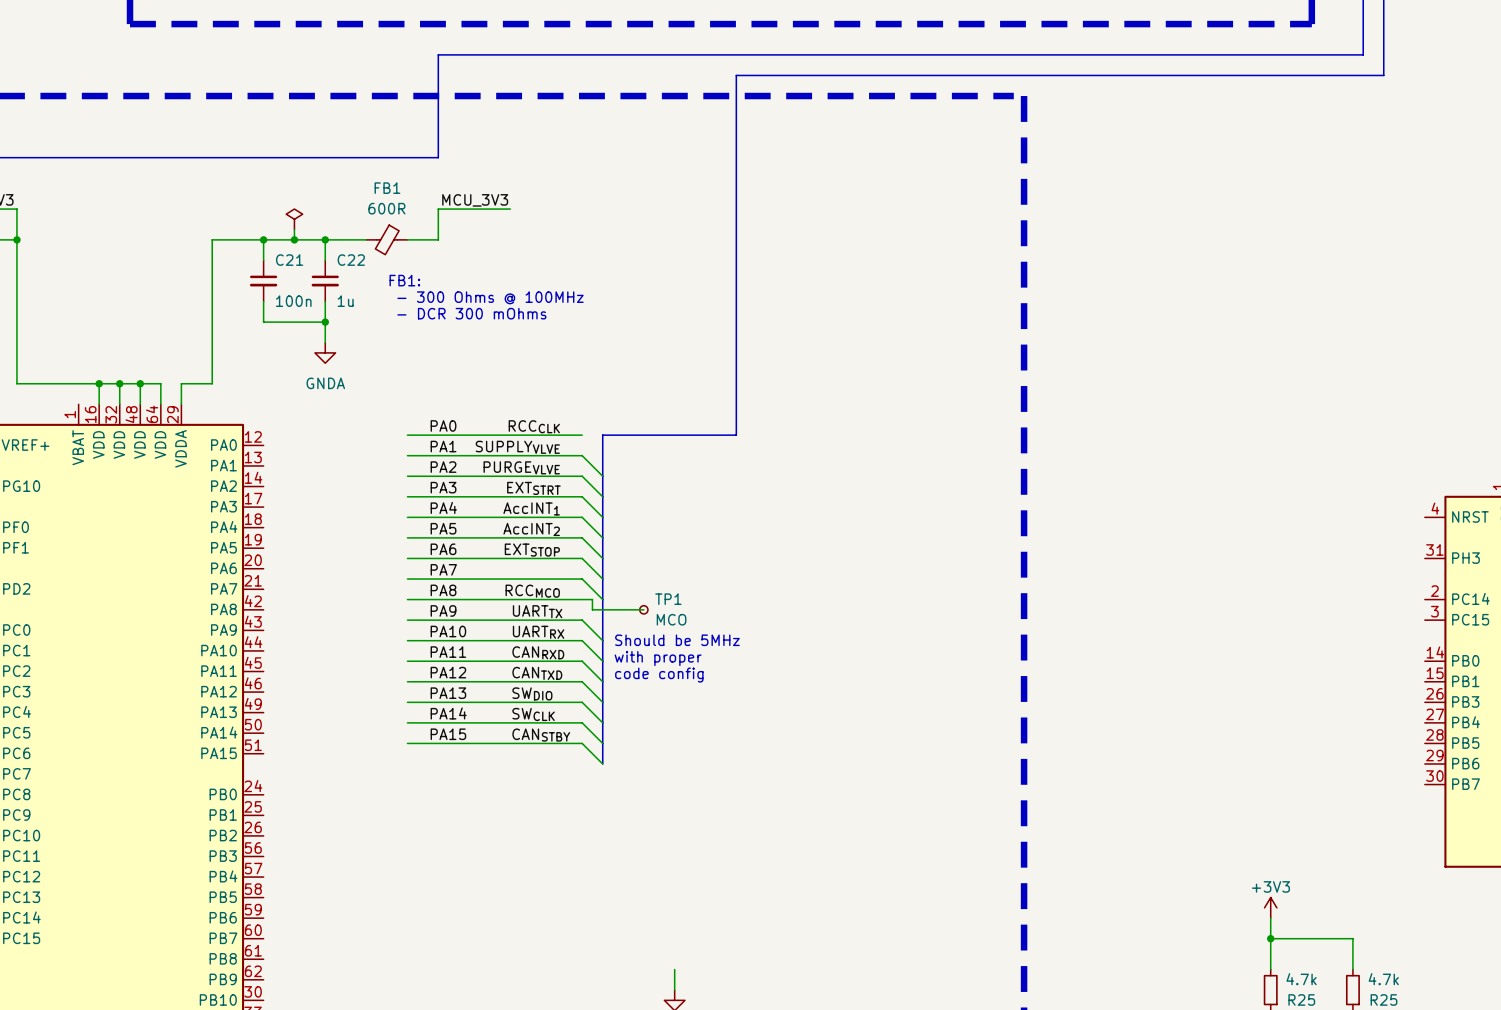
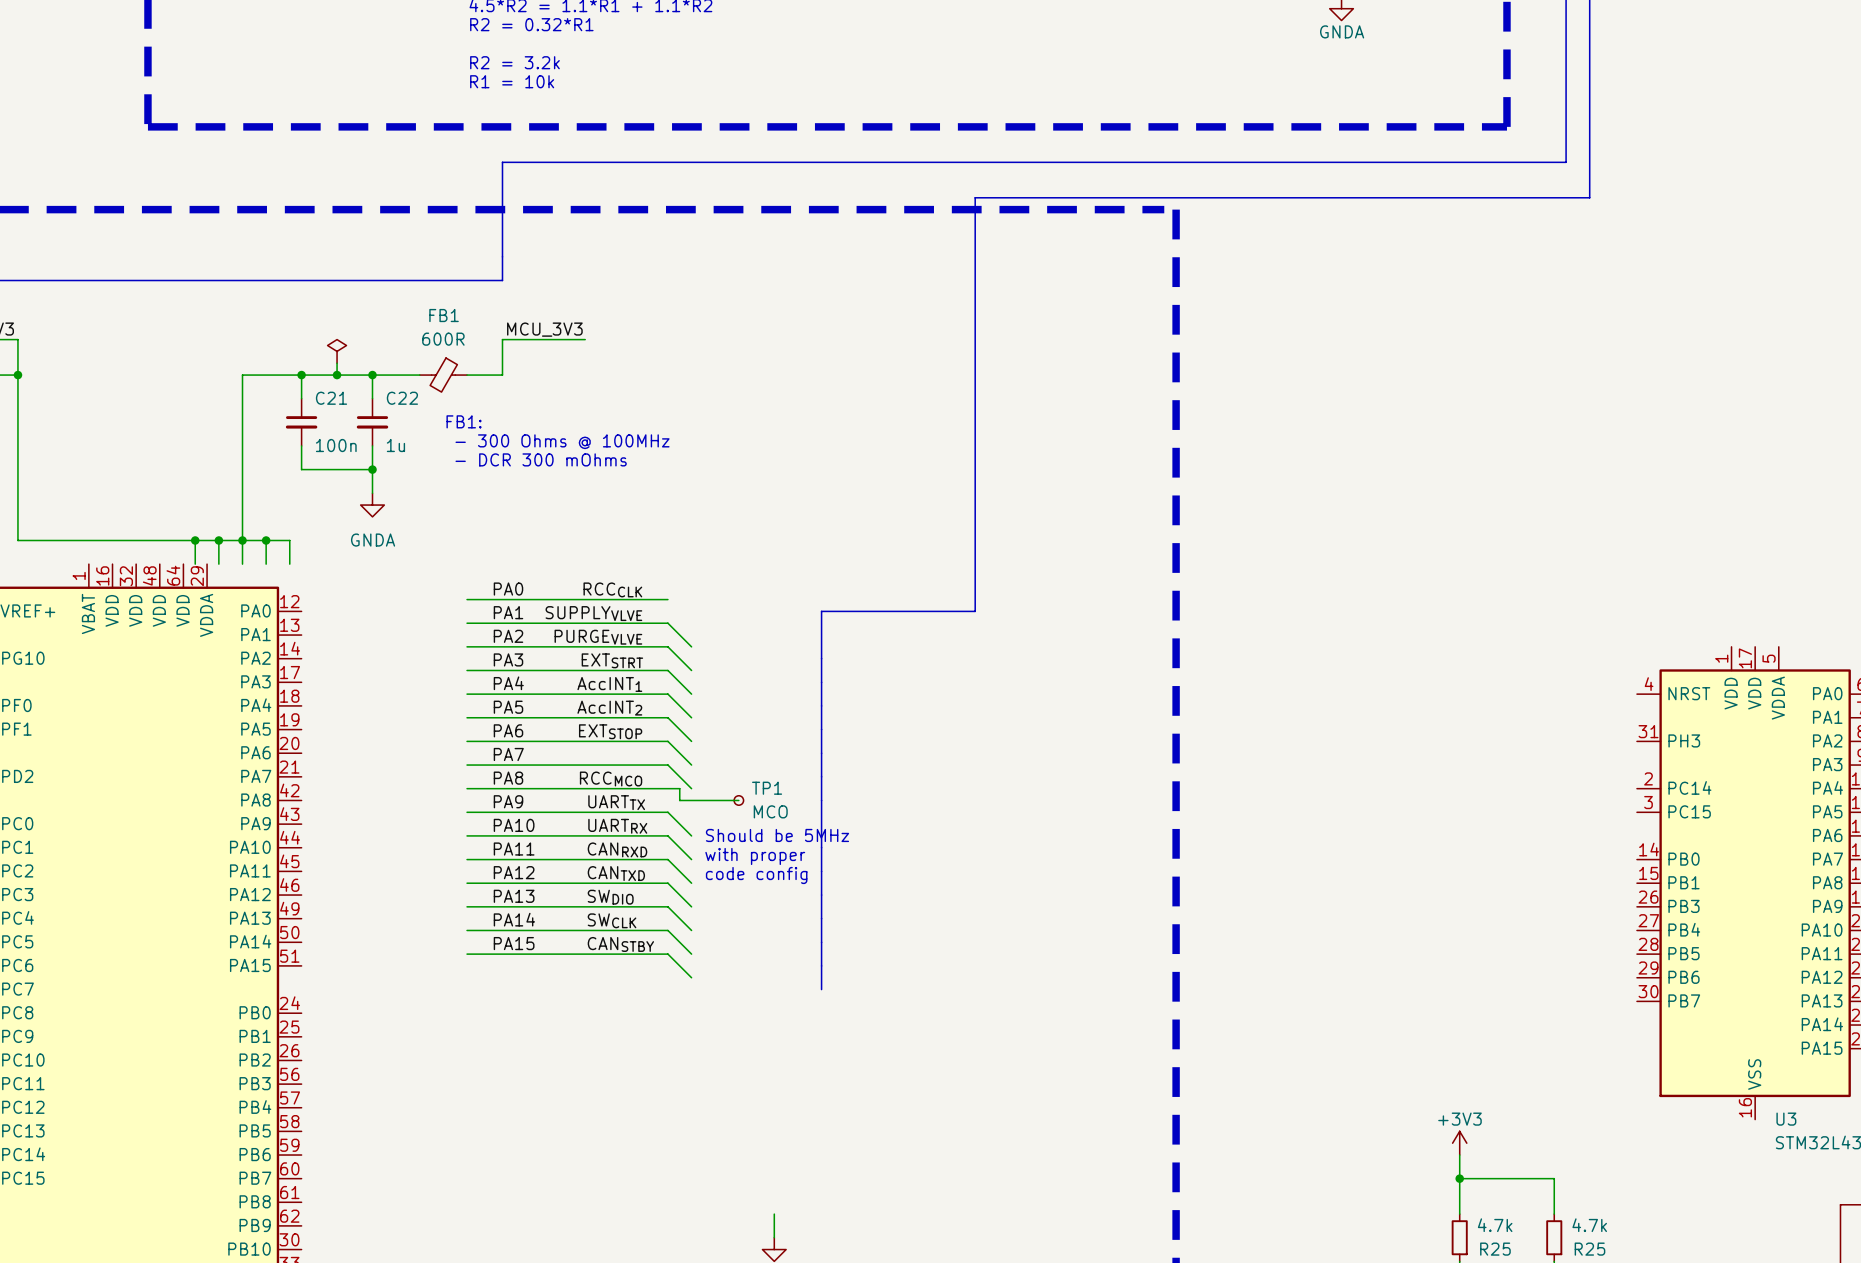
bus: (1383, 75) (736, 75) (736, 435) (602, 435) (602, 763) -> (1589, 185) (1589, 197) (975, 197) (975, 611) (821, 611) (821, 989)
wire: (99, 383) (99, 404) -> none
junction: (99, 383) -> none
wire: (119, 383) (119, 404) -> (195, 540) (195, 564)
junction: (119, 383) -> none
wire: (140, 383) (140, 404) -> (218, 540) (218, 564)
junction: (140, 383) -> none
wire: (160, 383) (160, 404) -> (183, 540) (207, 540)
junction: none -> (195, 540)
wire: (181, 383) (181, 404) -> (266, 540) (266, 564)
junction: none -> (218, 540)
junction: none -> (242, 540)
junction: none -> (266, 540)
wire: none -> (242, 564) (242, 540) (289, 540) (289, 564)

